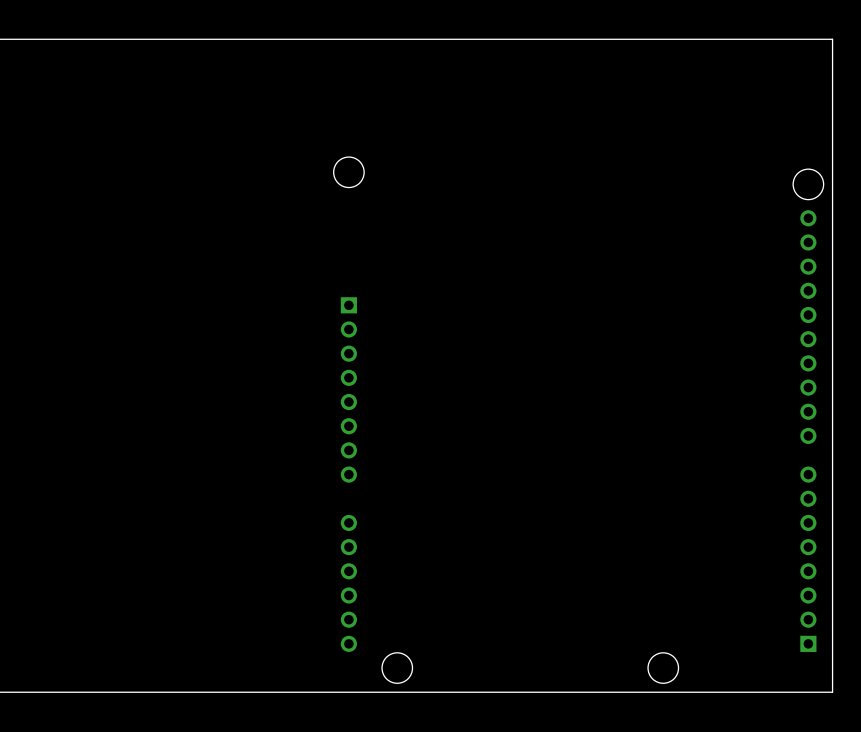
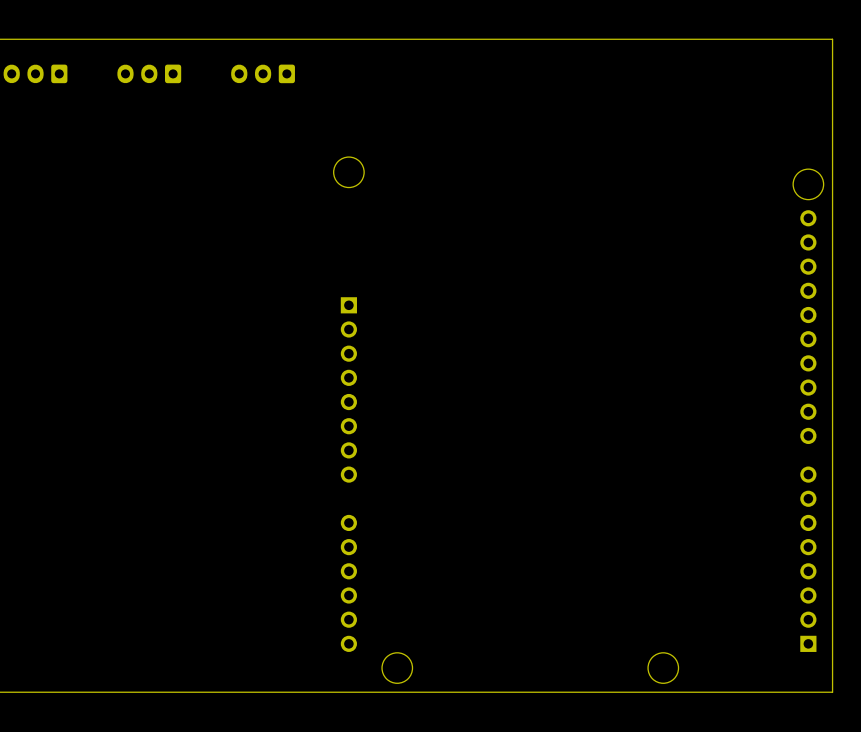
part: none -> (35, 73)
part: none -> (149, 73)
part: none -> (263, 73)

